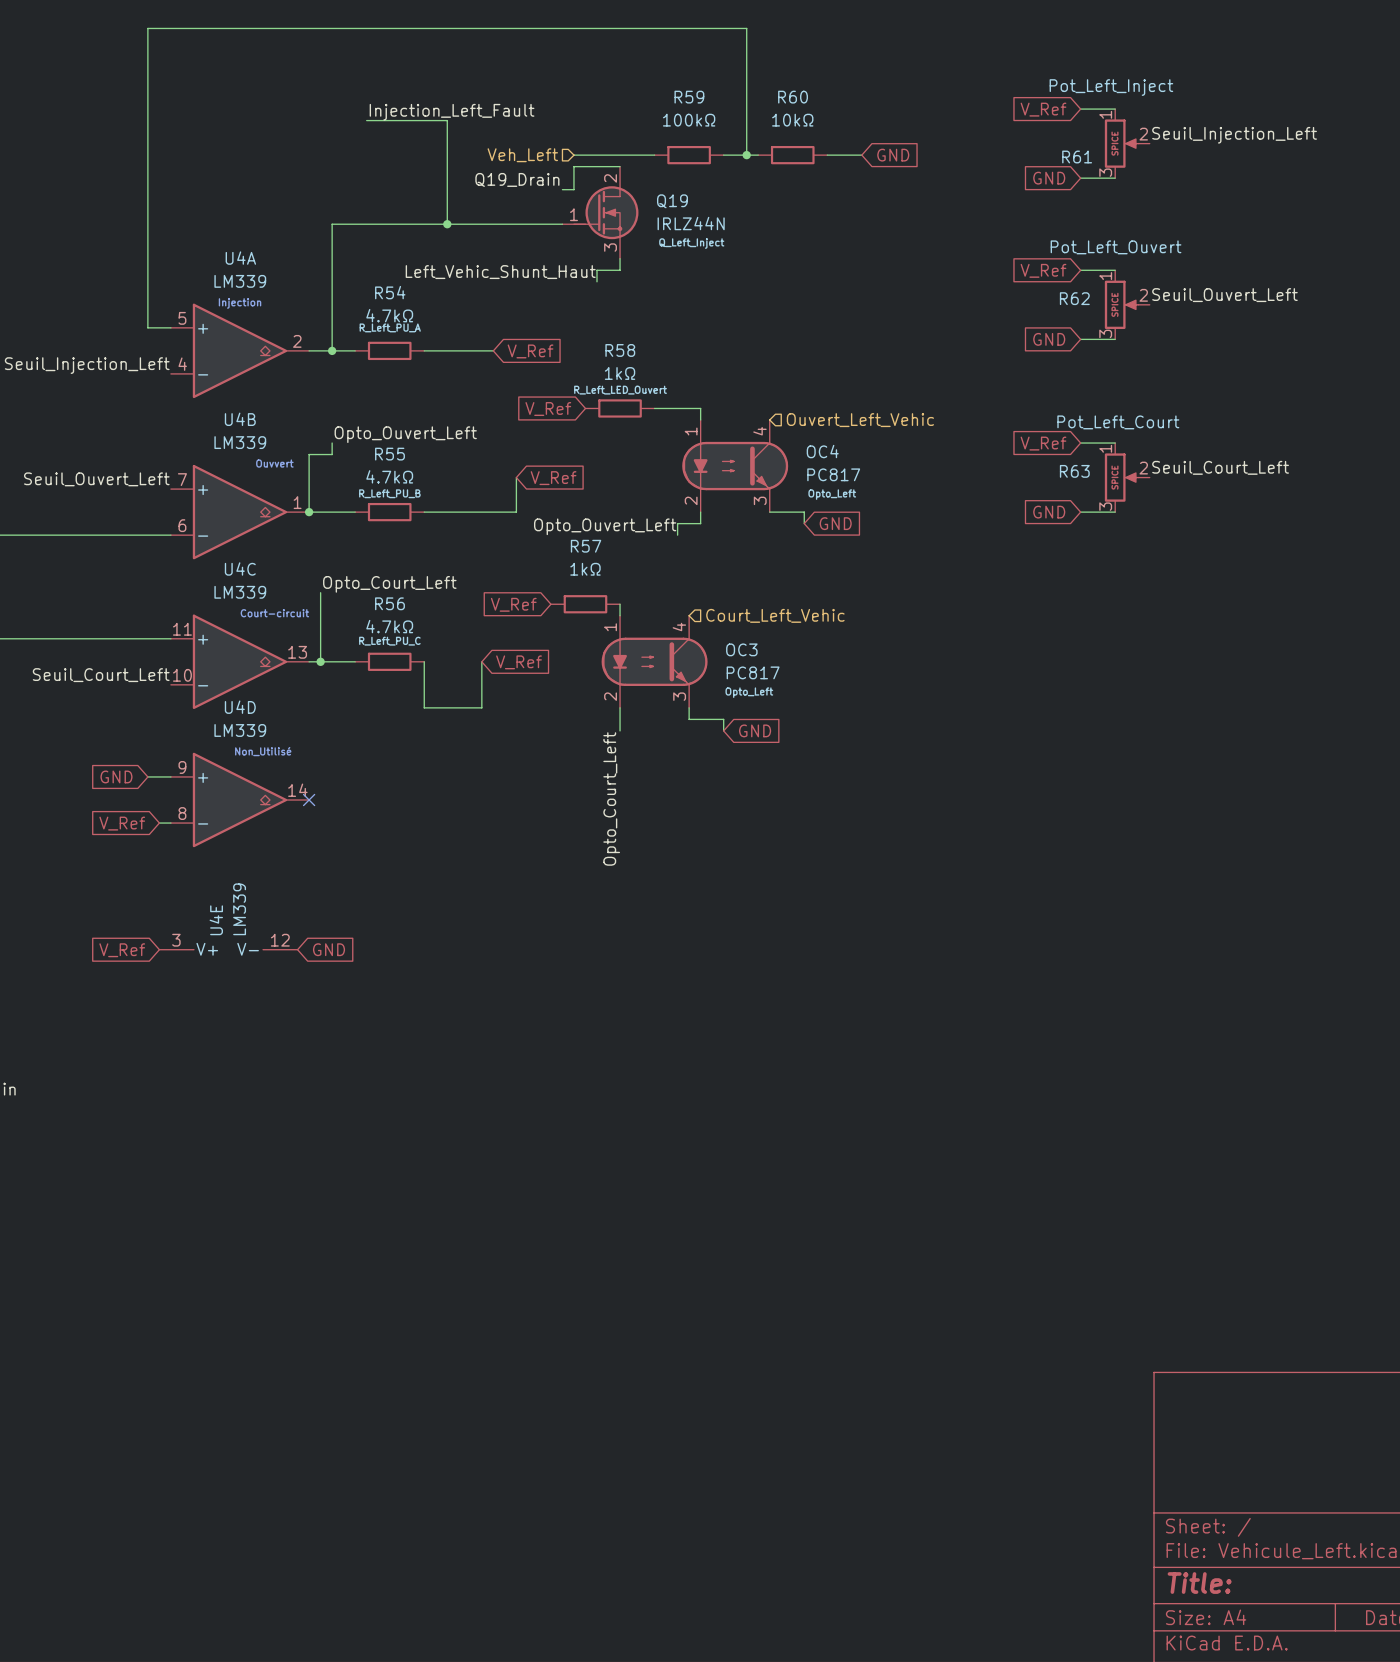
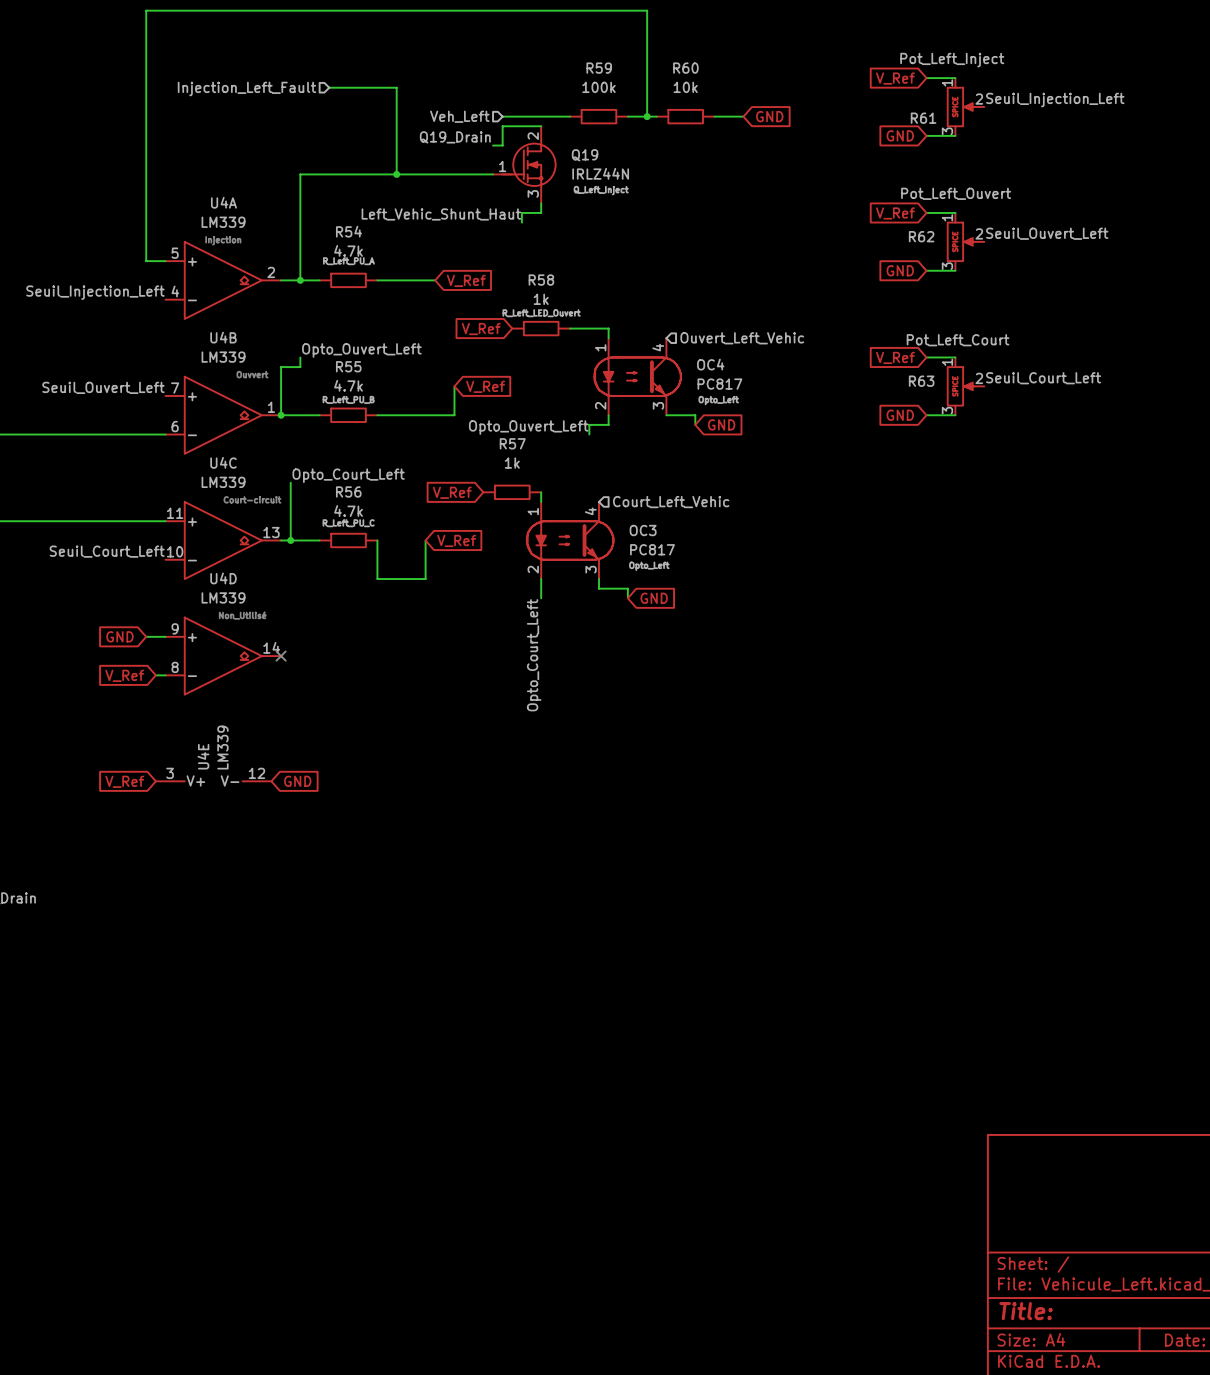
label: Injection_Left_Fault (452, 112) -> none
R59 value: 100kΩ (689, 120) -> 100k (598, 87)
R60 value: 10kΩ (792, 120) -> 10k (685, 87)
hierarchical label: none -> Injection_Left_Fault (246, 88)
R54 value: 4.7kΩ (389, 315) -> 4.7k (348, 250)
R58 value: 1kΩ (620, 373) -> 1k (541, 299)
R55 value: 4.7kΩ (389, 476) -> 4.7k (348, 385)
R57 value: 1kΩ (585, 569) -> 1k (512, 463)
R56 value: 4.7kΩ (389, 626) -> 4.7k (348, 511)

